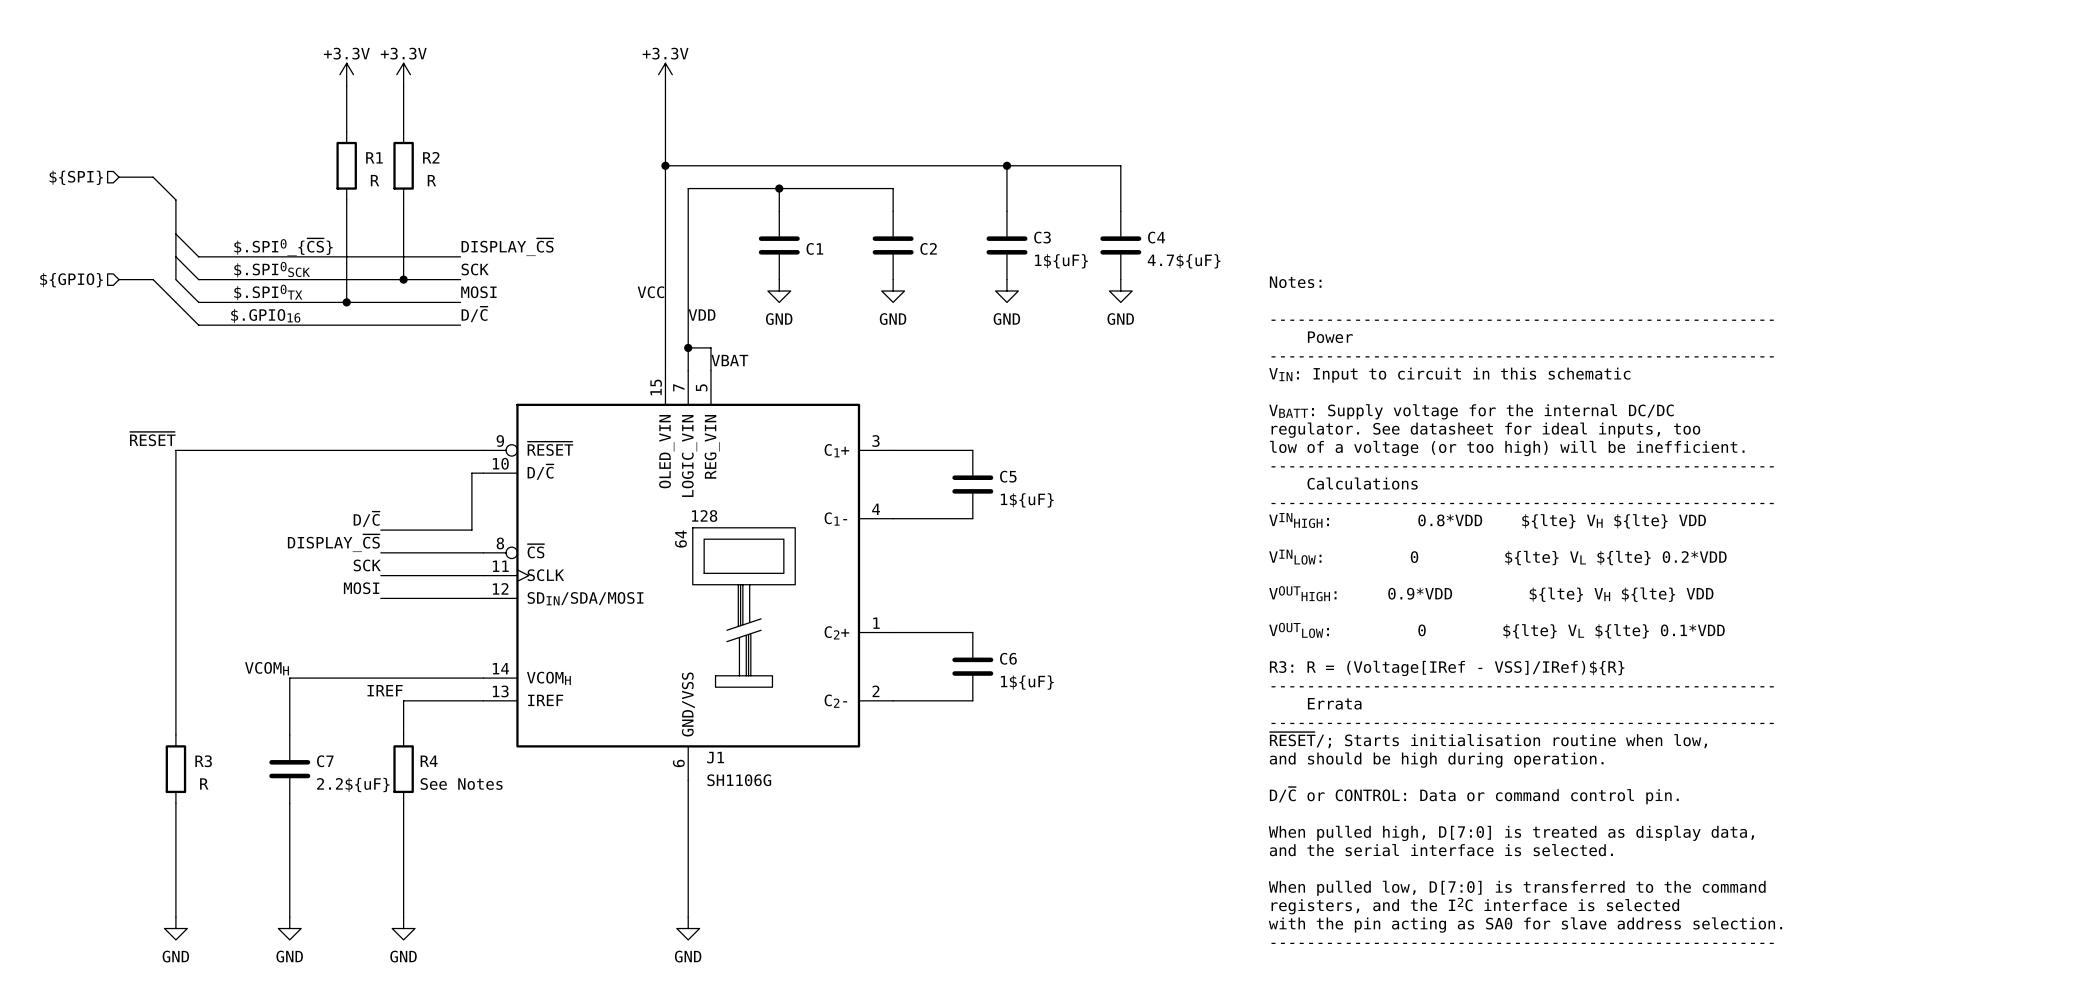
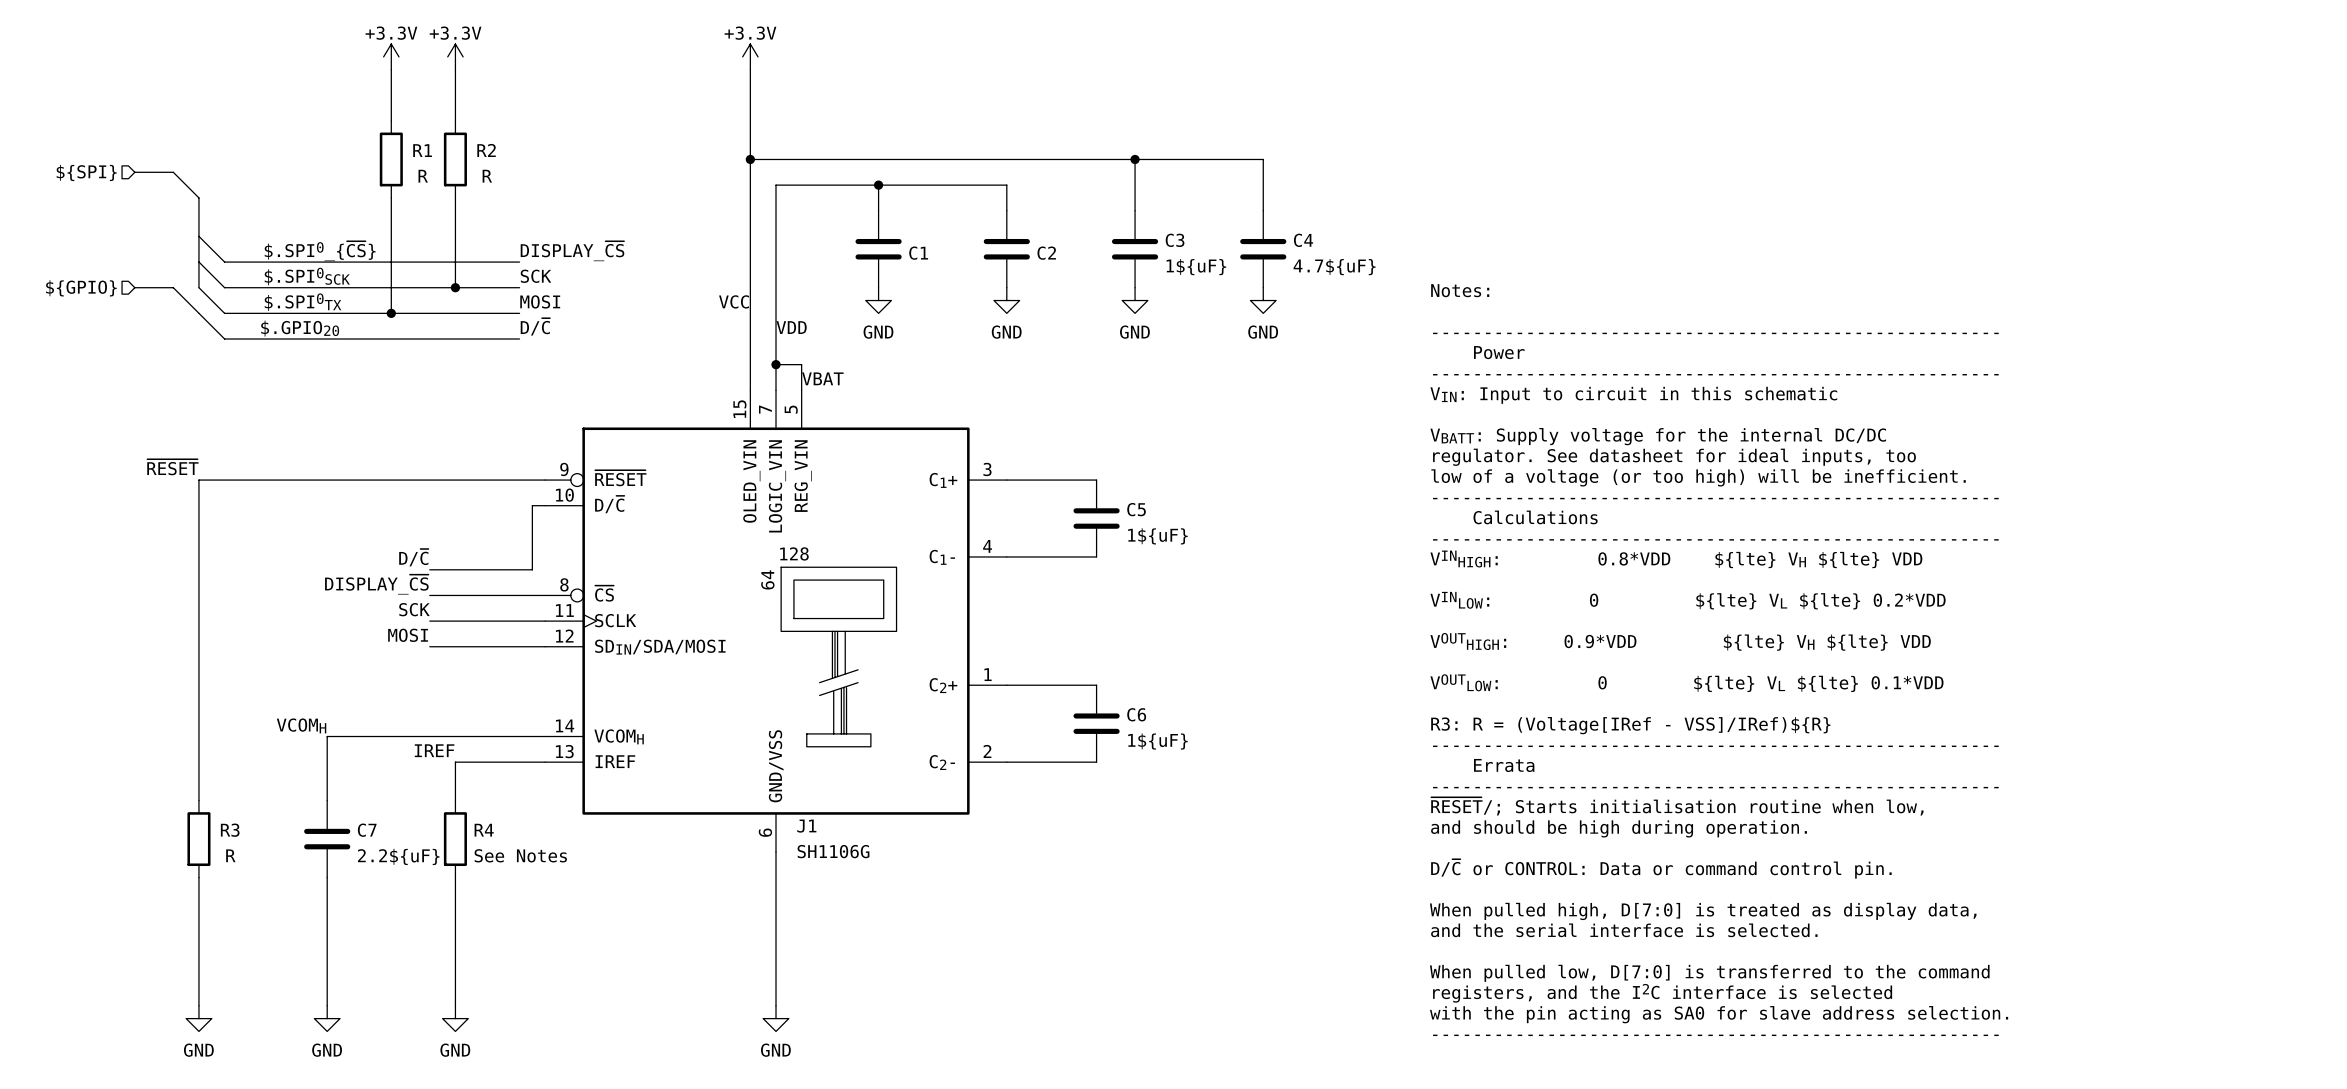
label: $.GPIO16 (265, 315) -> $.GPIO20 (300, 328)

